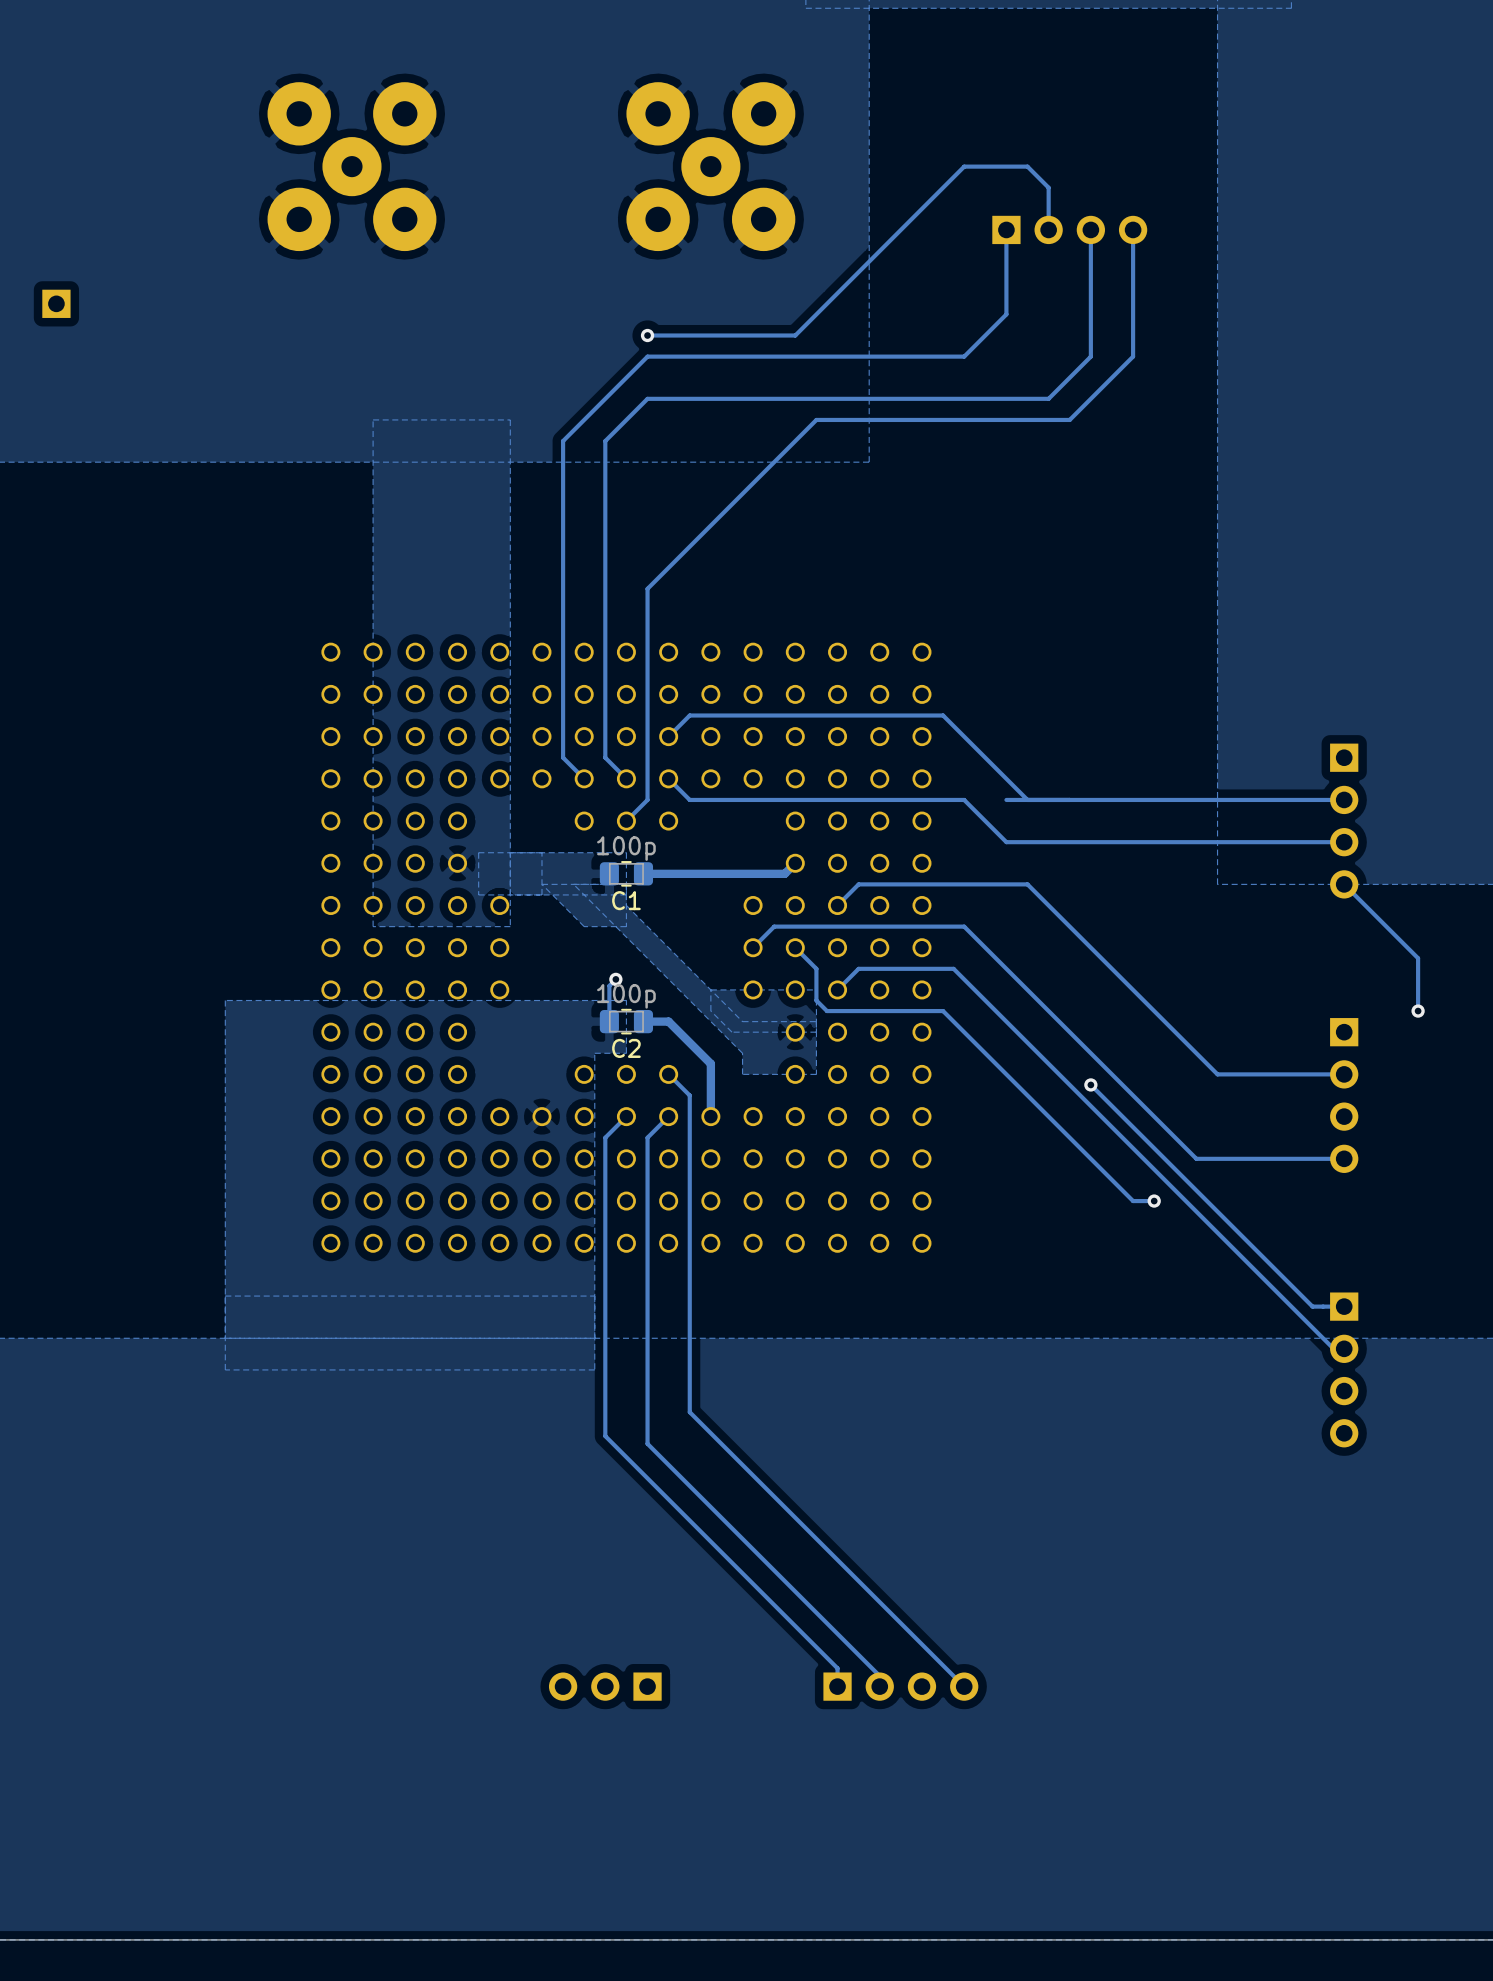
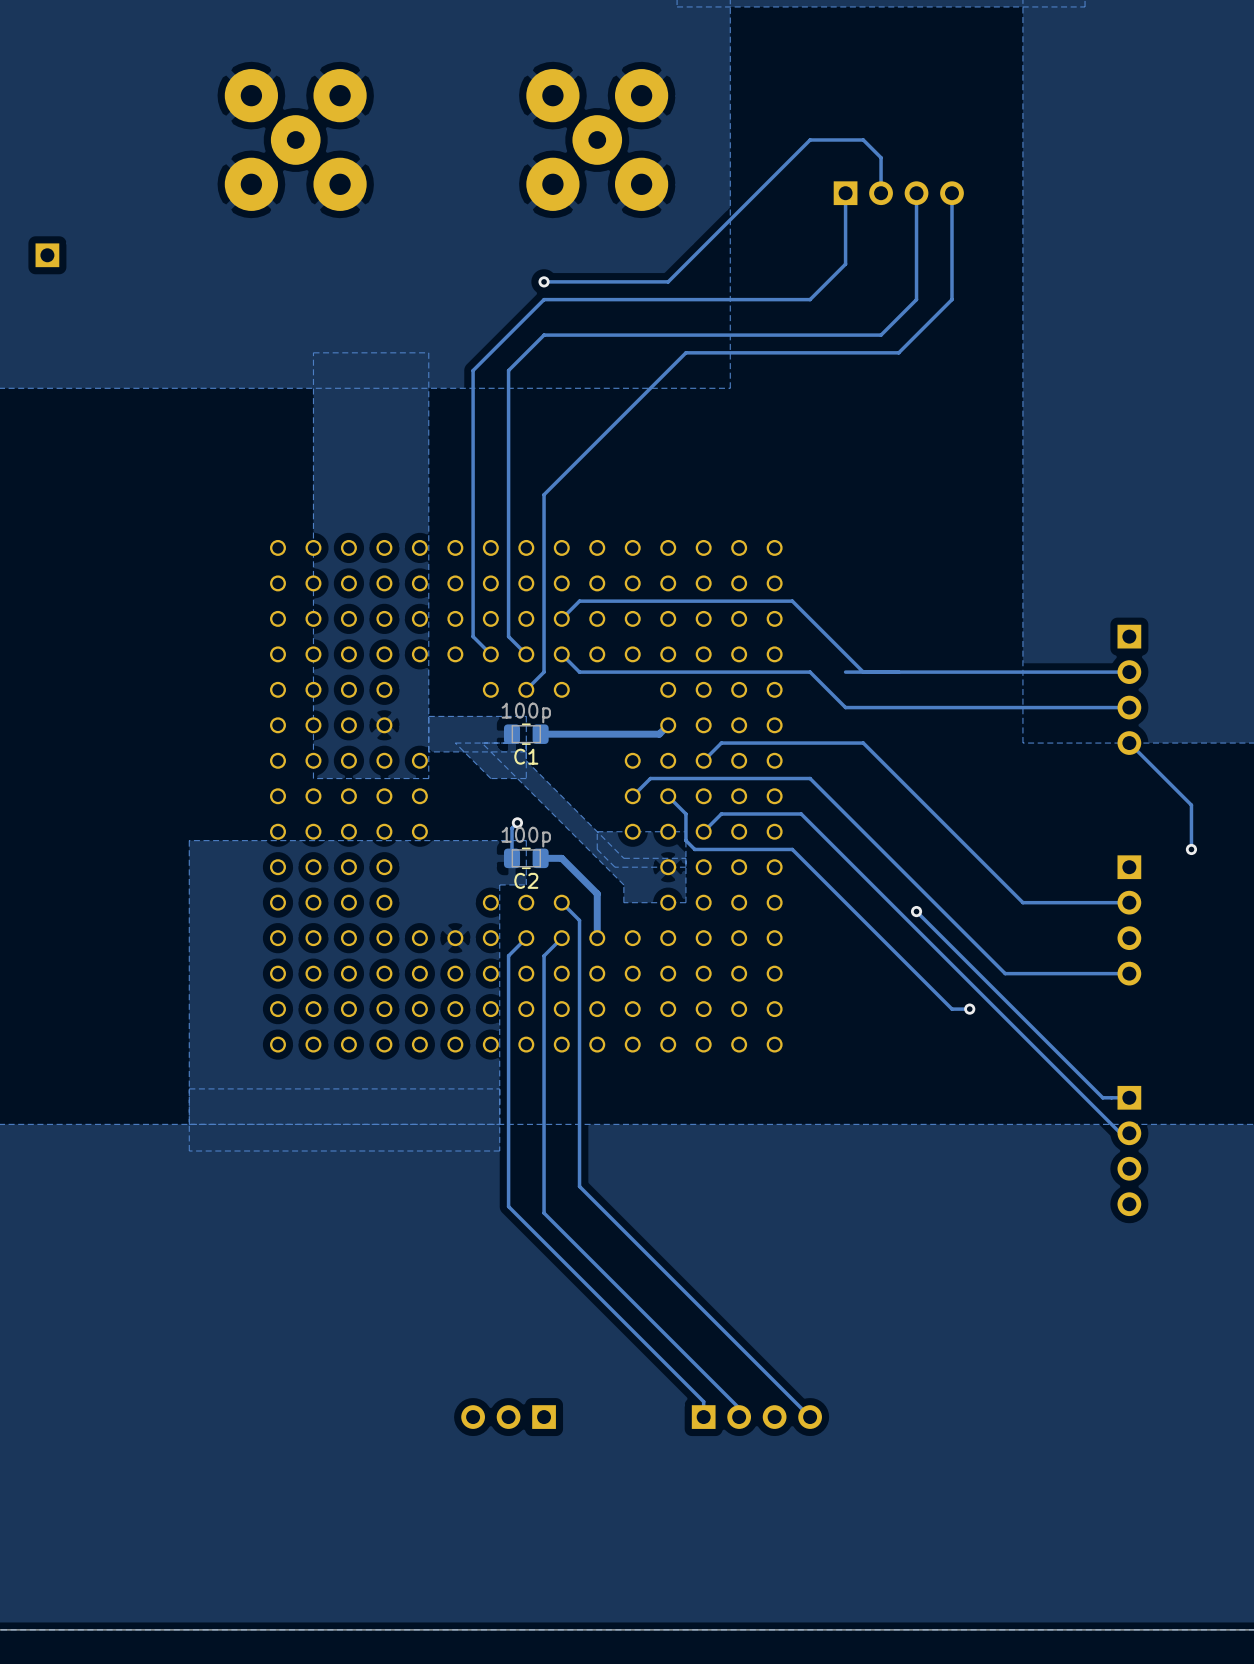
zone outline: (510, 852) (478, 852) (478, 894) (510, 894) -> none
zone outline: (541, 852) (541, 894) -> none

